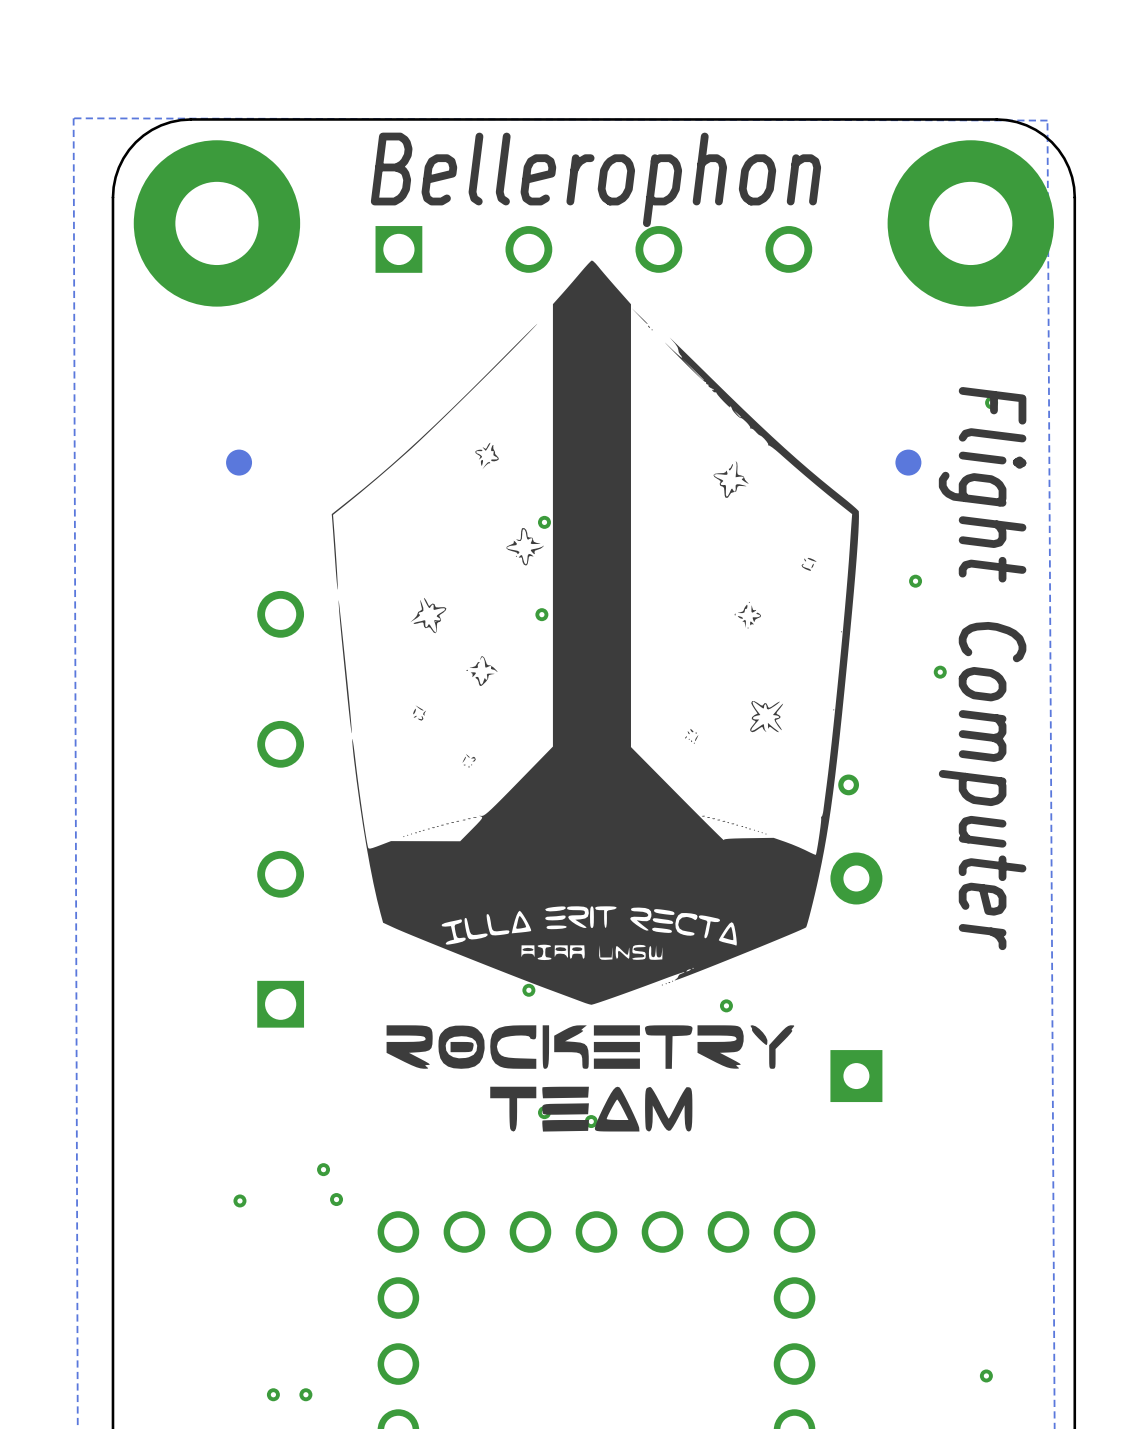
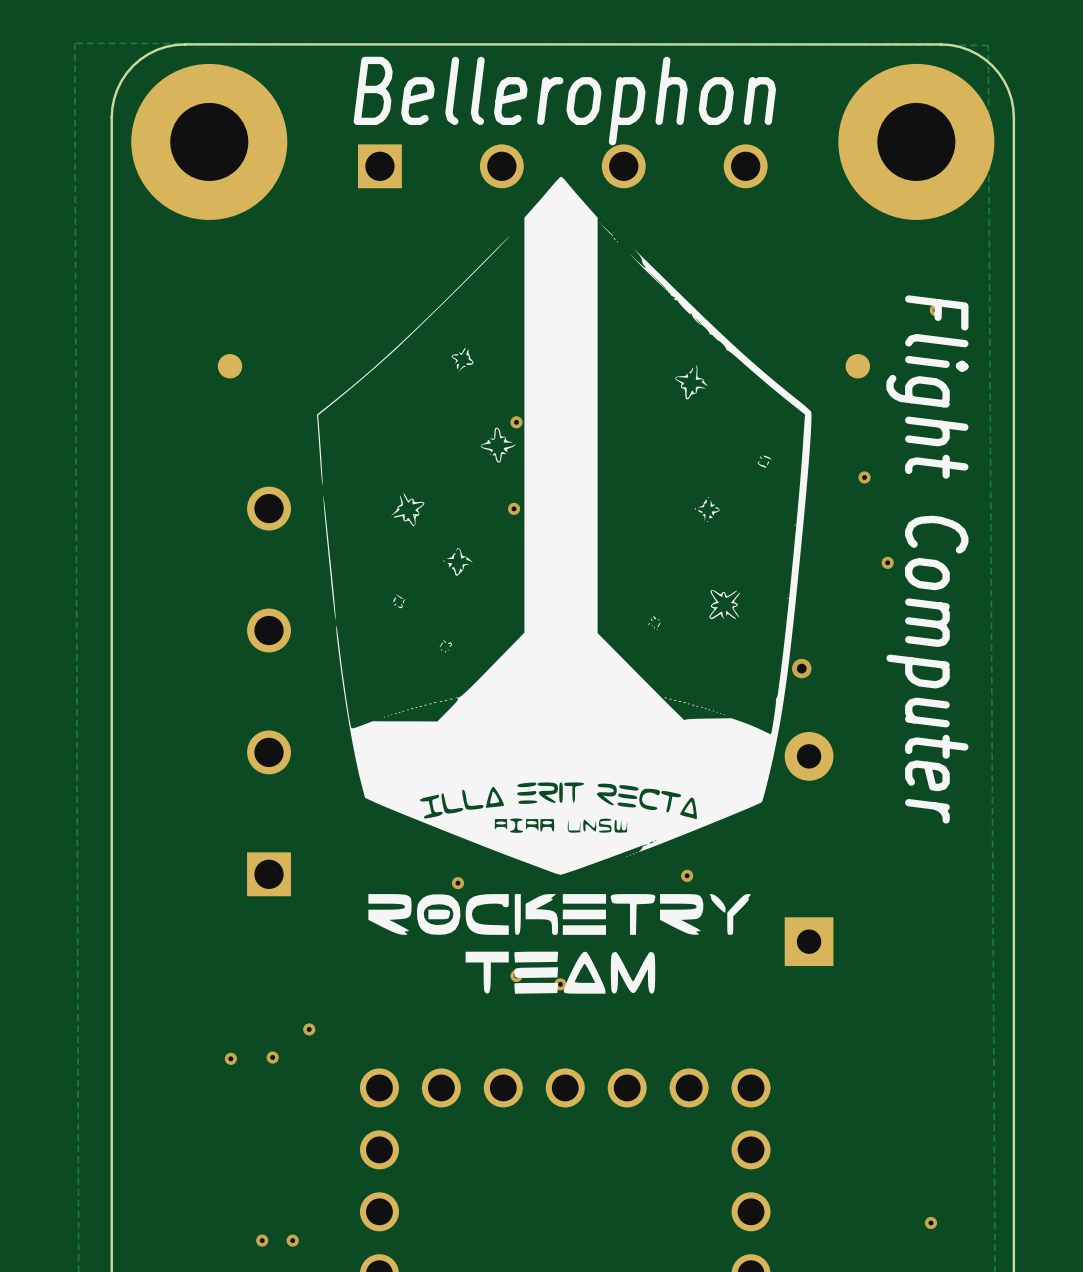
via position: (528, 990) -> (457, 883)
via position: (336, 1199) -> (272, 1057)

